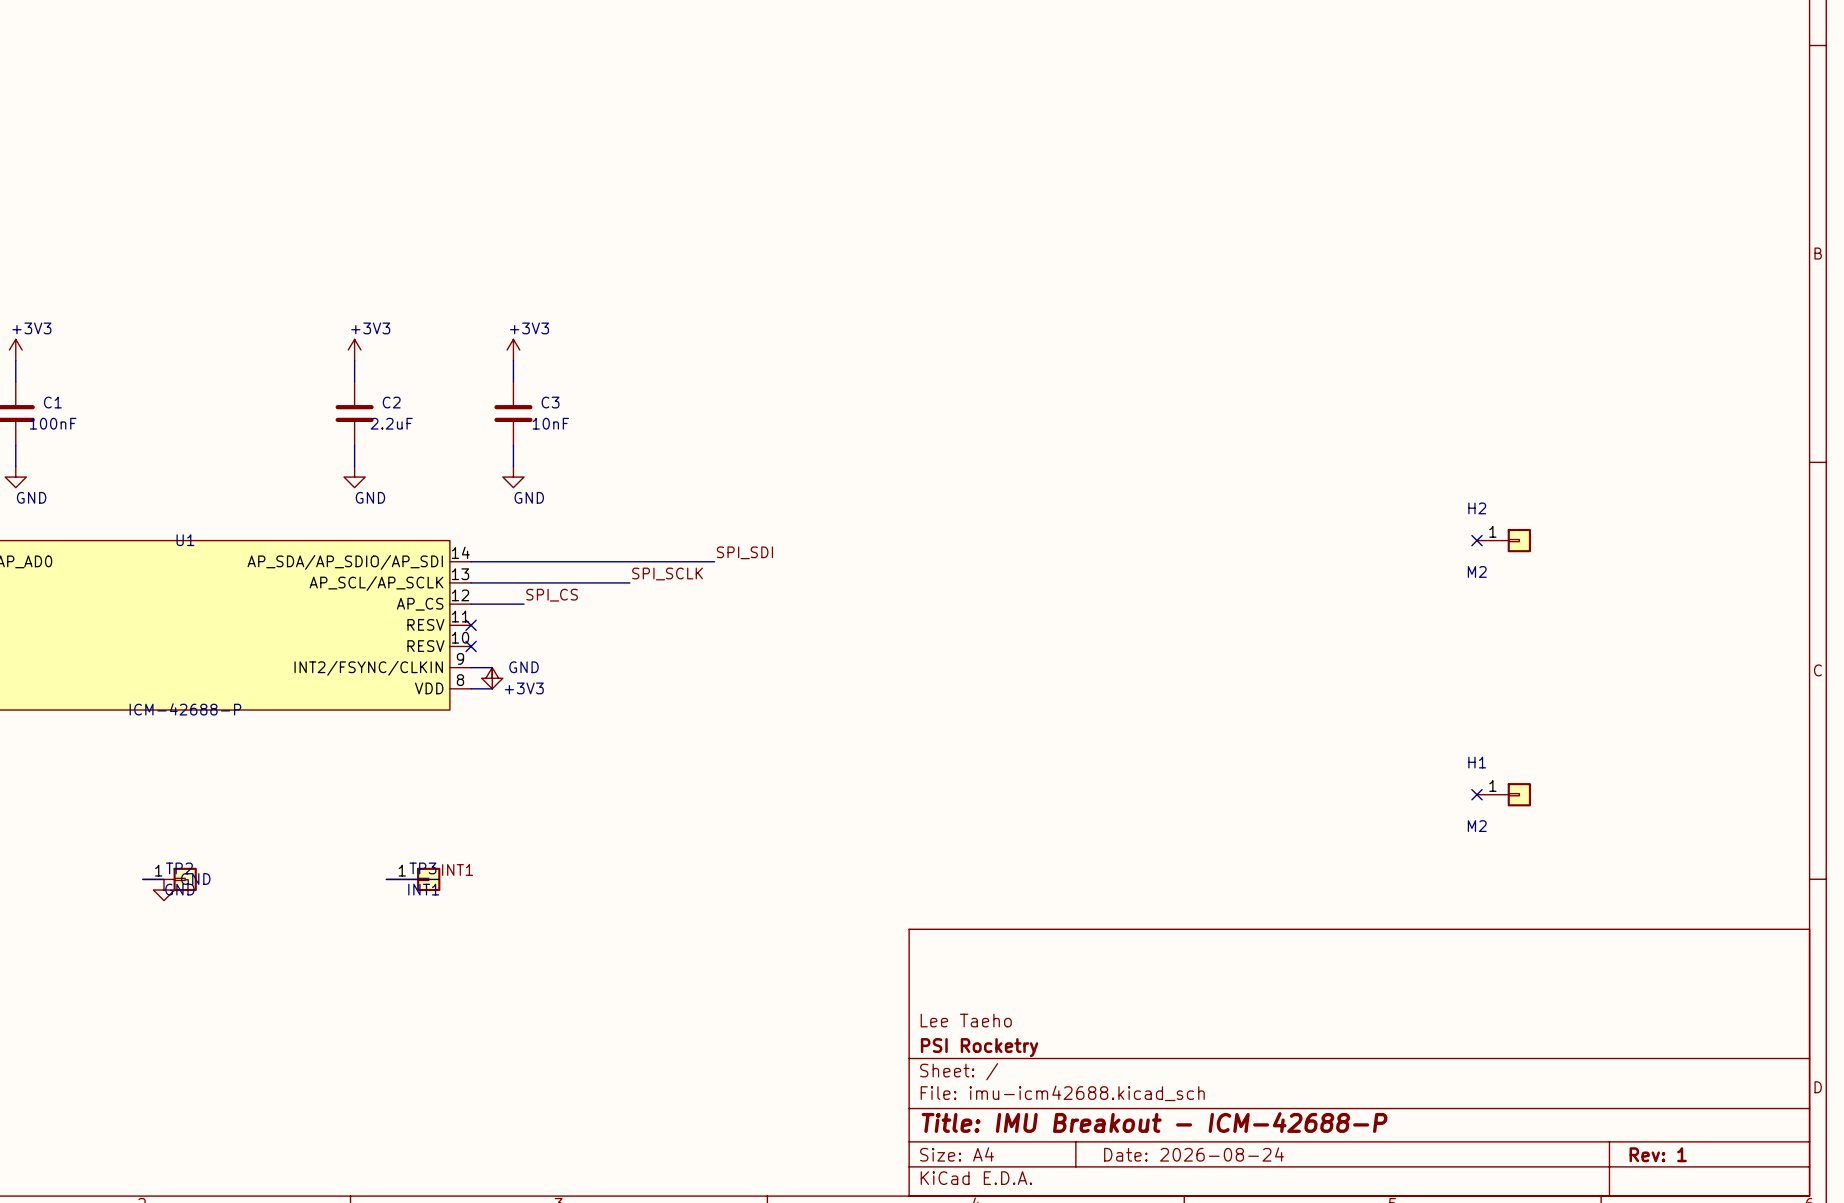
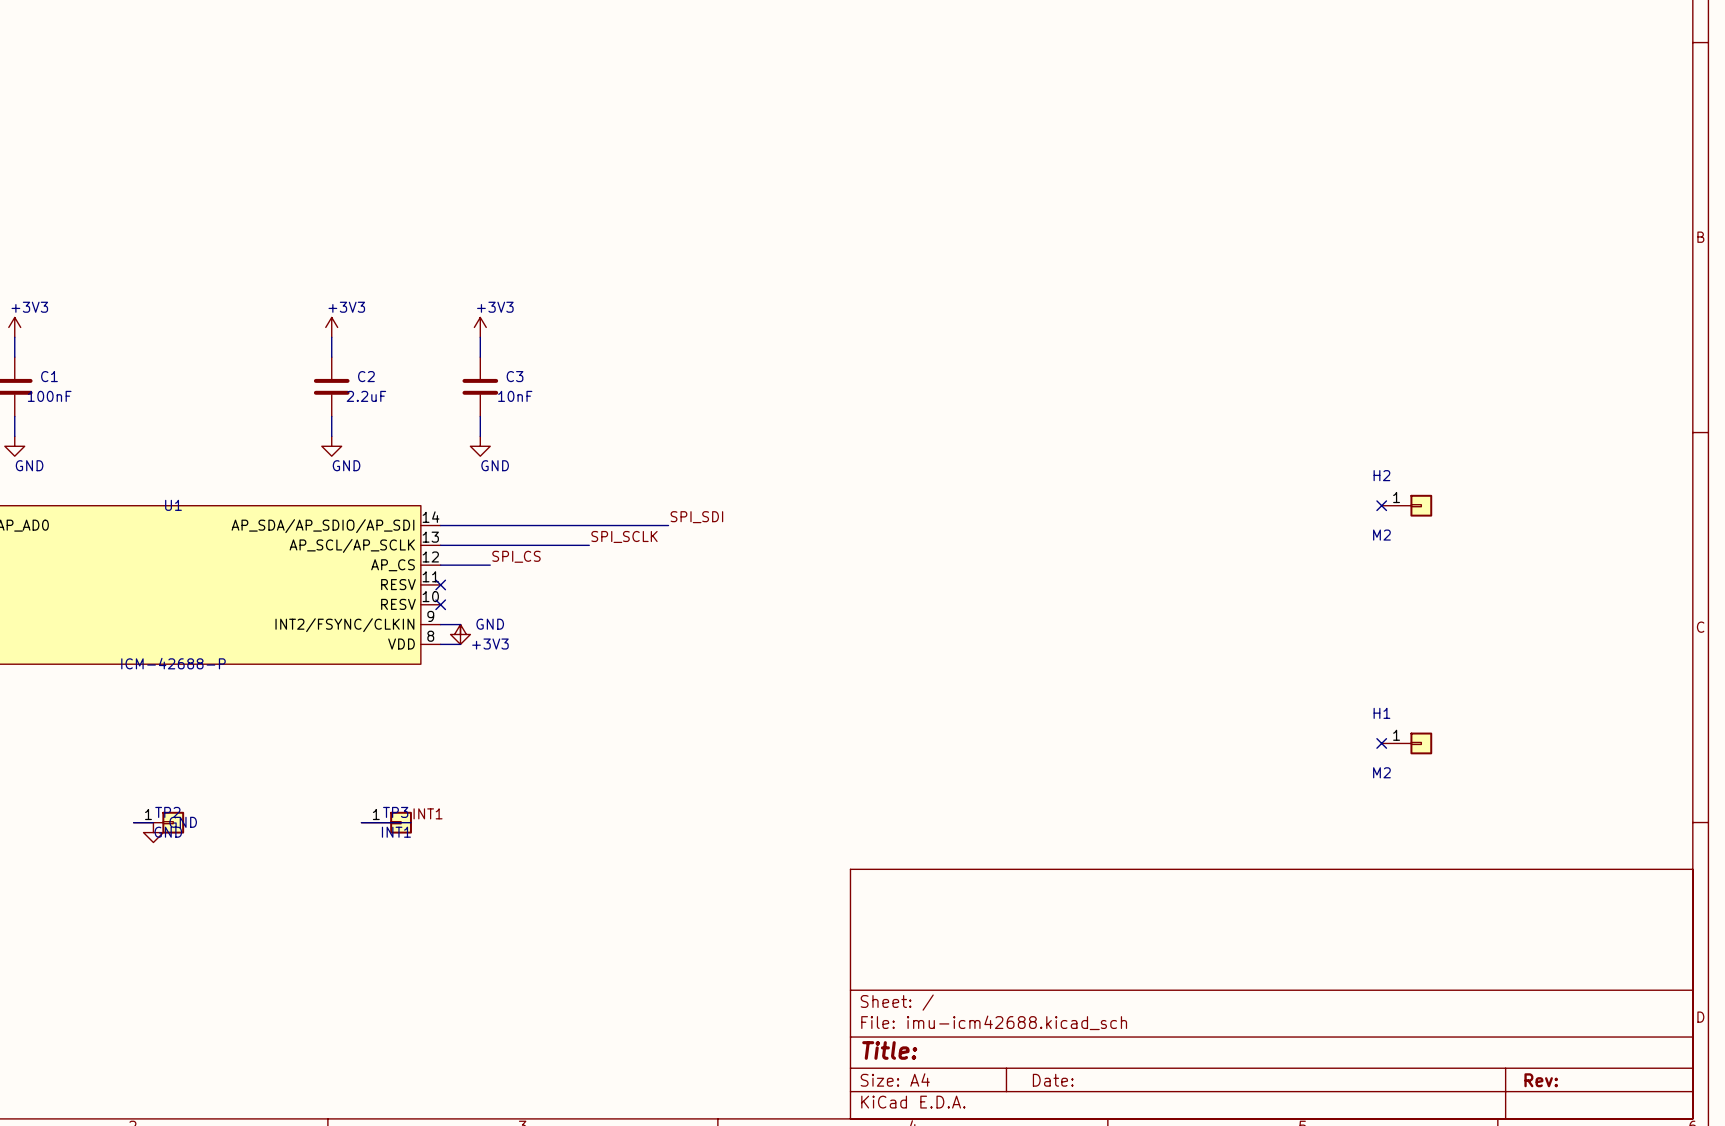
title block: Lee Taeho (966, 1020) -> none
title block: PSI Rocketry (979, 1047) -> none
title block: Title: IMU Breakout - ICM-42688-P (1154, 1122) -> Title: (889, 1050)
title block: Date: 2026-08-24 (1194, 1154) -> Date: (1053, 1080)
title block: Rev: 1 (1658, 1154) -> Rev: (1541, 1080)

